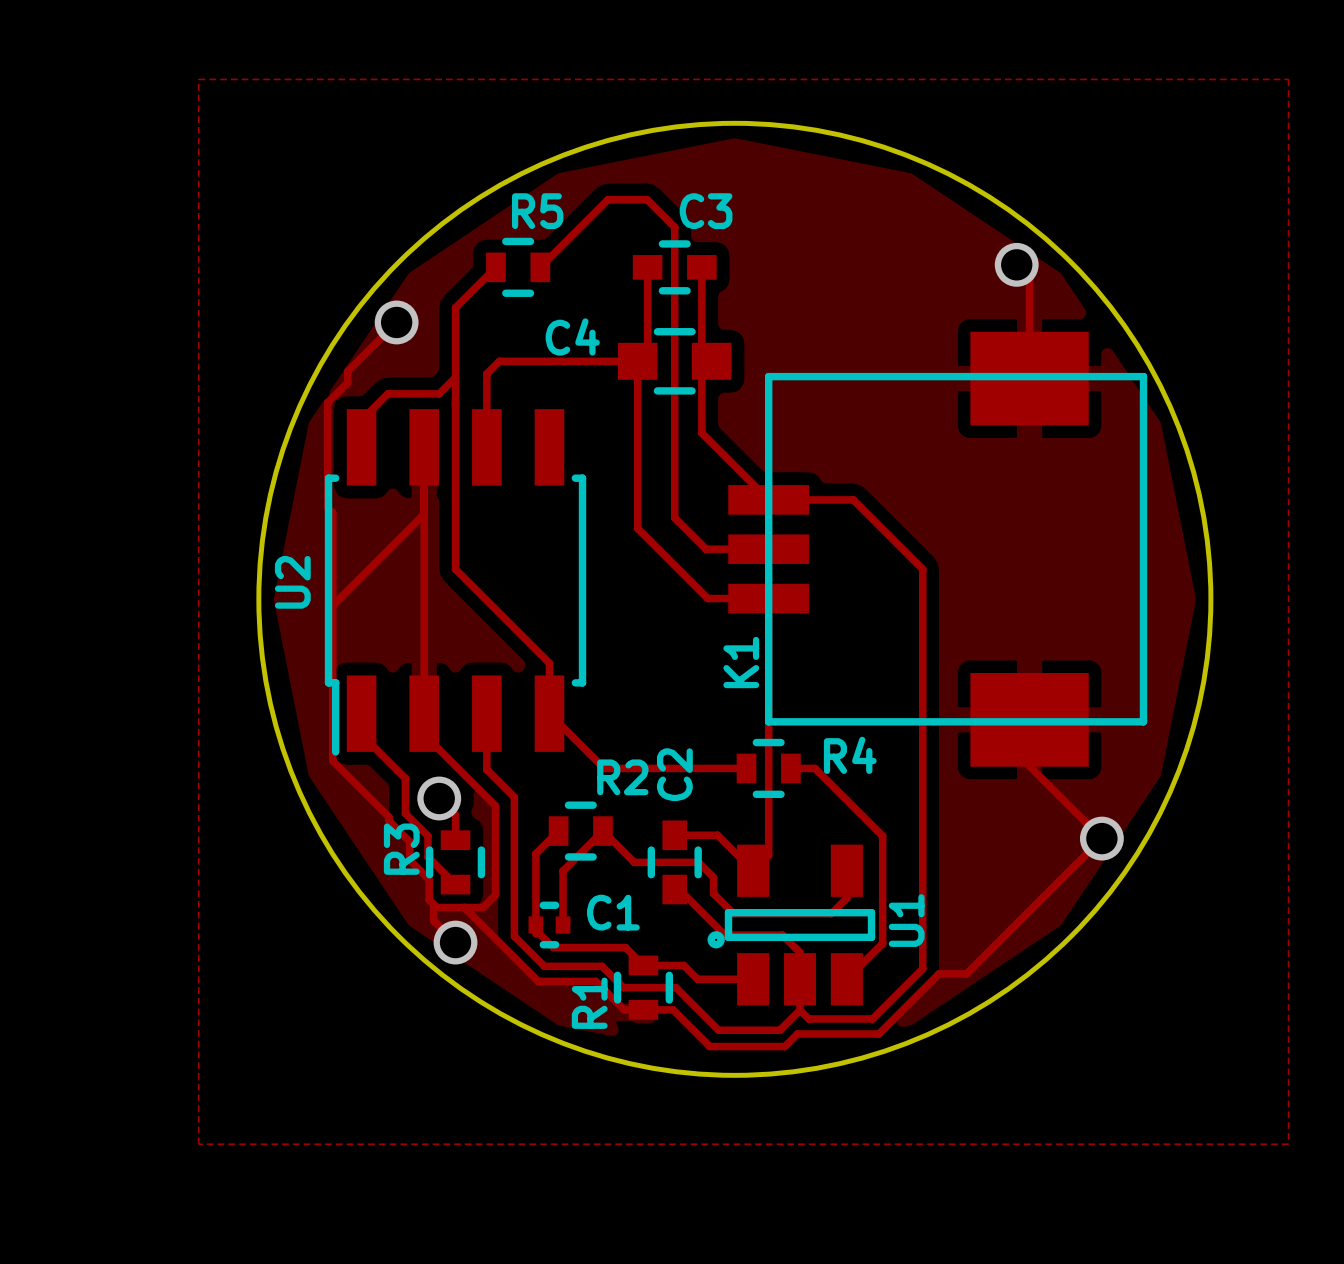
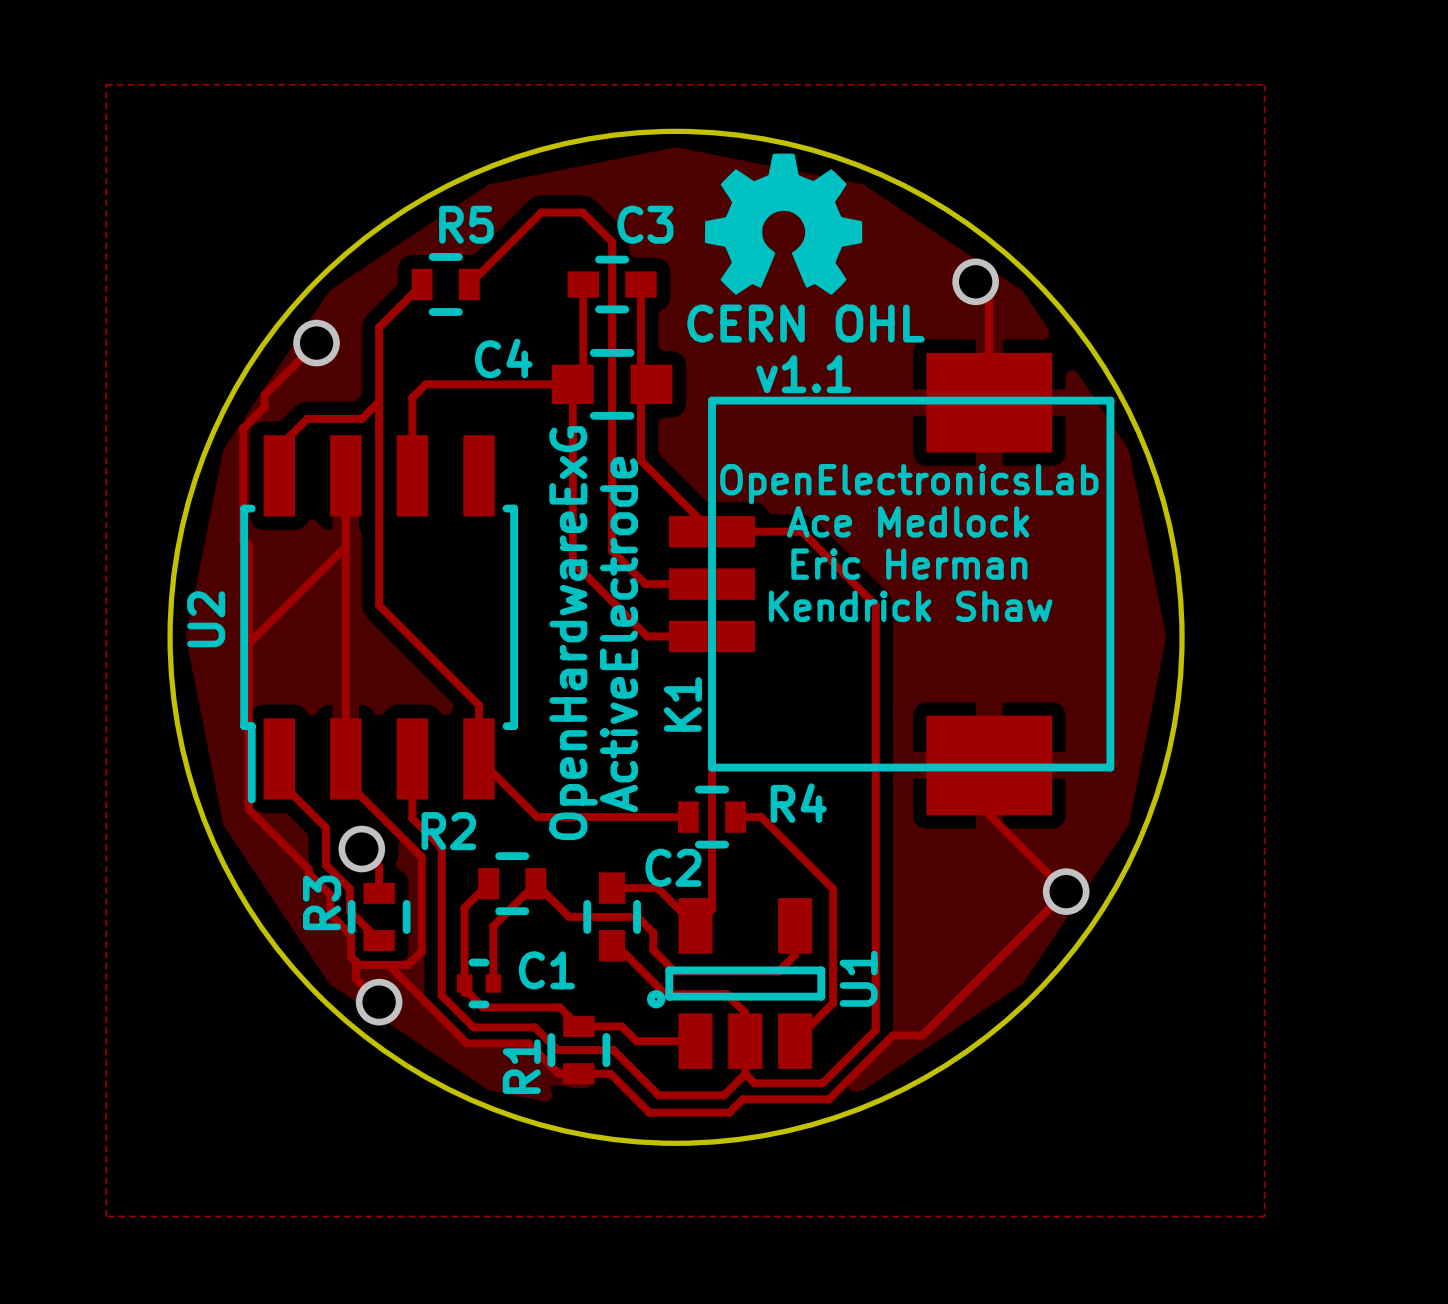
drawing: none -> [704, 153, 863, 295]
text: none -> CERN OHL (806, 323)
text: none -> v1.1 (803, 374)
text: none -> OpenElectronicsLab (909, 484)
text: none -> Ace Medlock (908, 521)
text: none -> Eric Herman (909, 564)
text: none -> Kendrick Shaw (910, 606)
text: none -> OpenHardwareExG (573, 633)
text: none -> ActiveElectrode (618, 634)
C2 name rotation: 0° (674, 774) -> 90° clockwise (673, 867)
R2 name position: R2 (622, 777) -> R2 (448, 831)

